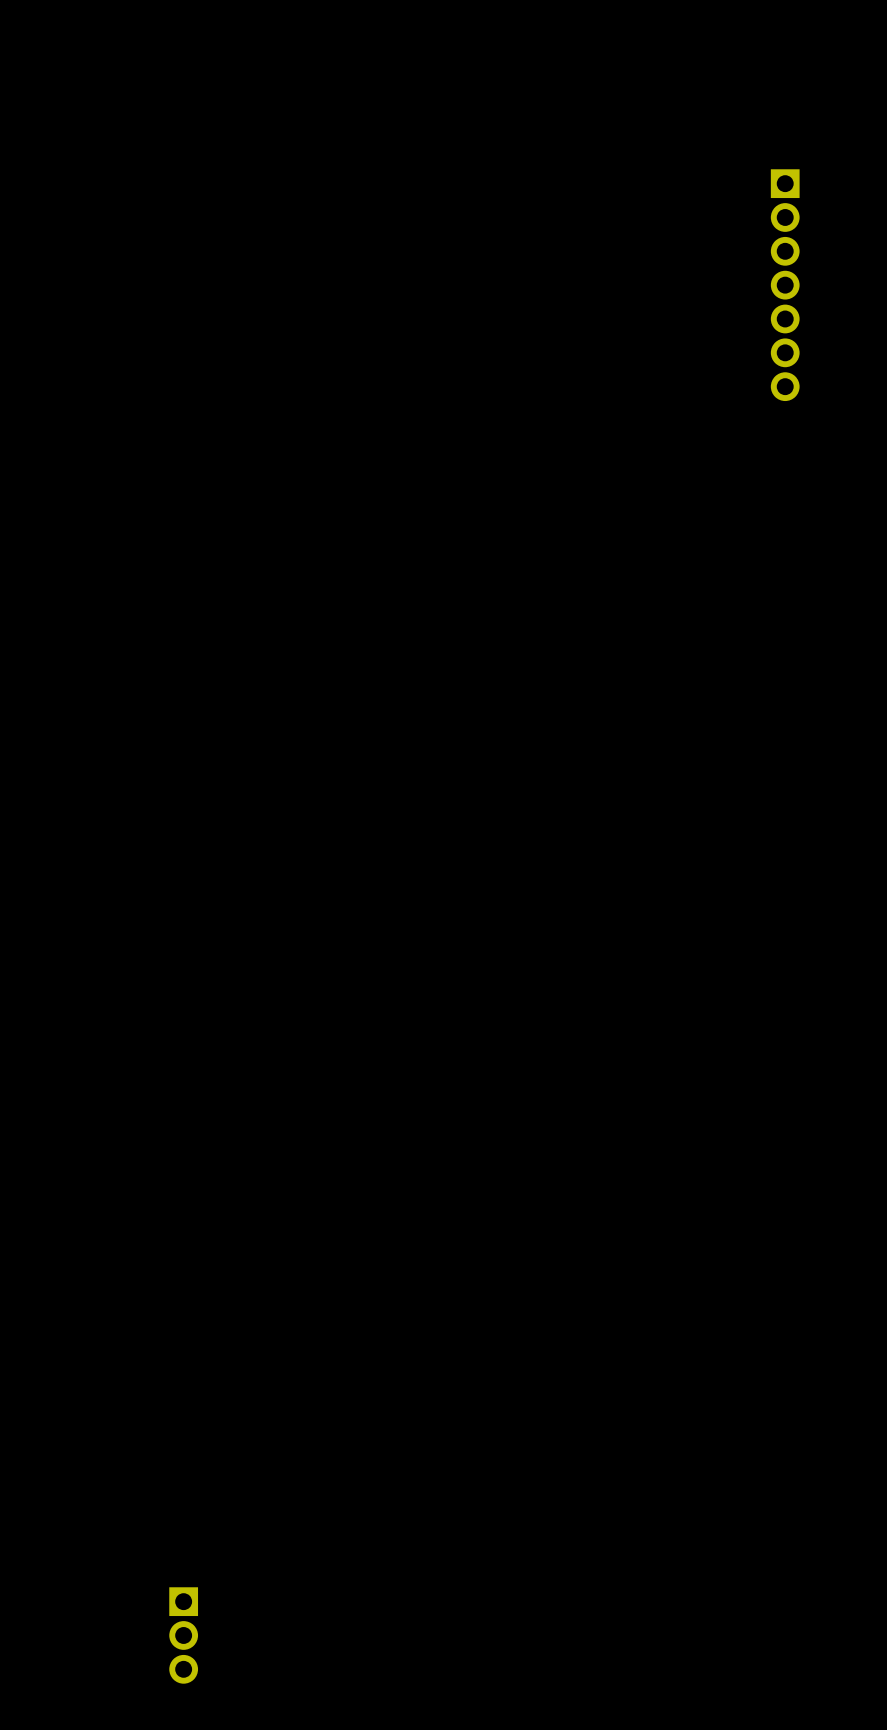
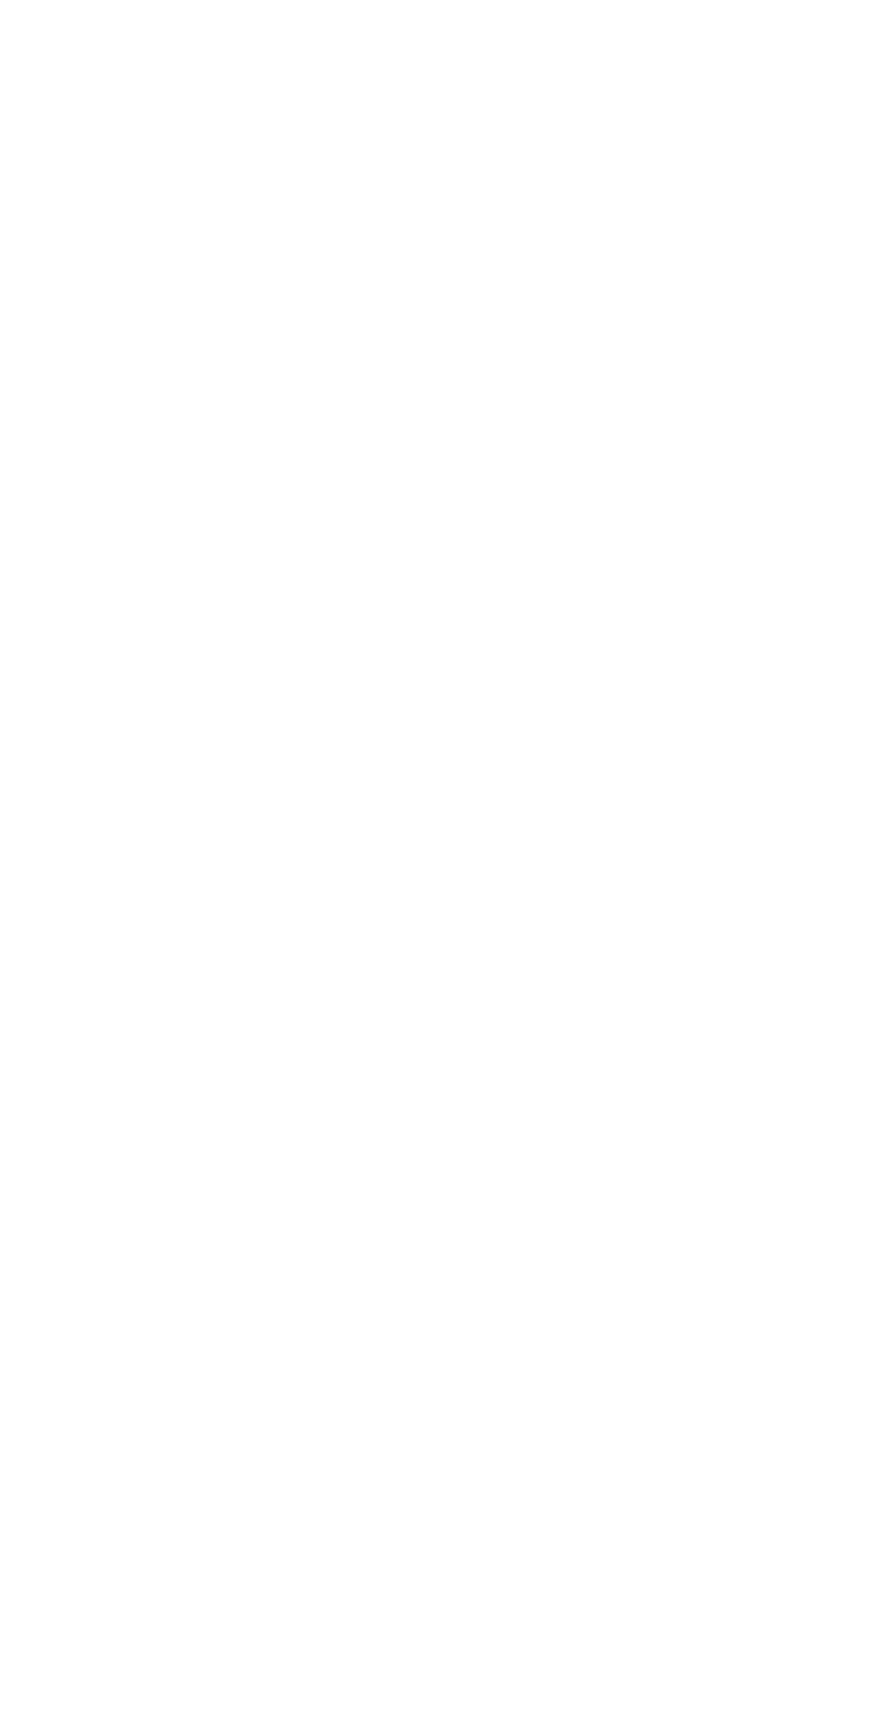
part: (785, 285) -> none
part: (183, 1635) -> none

